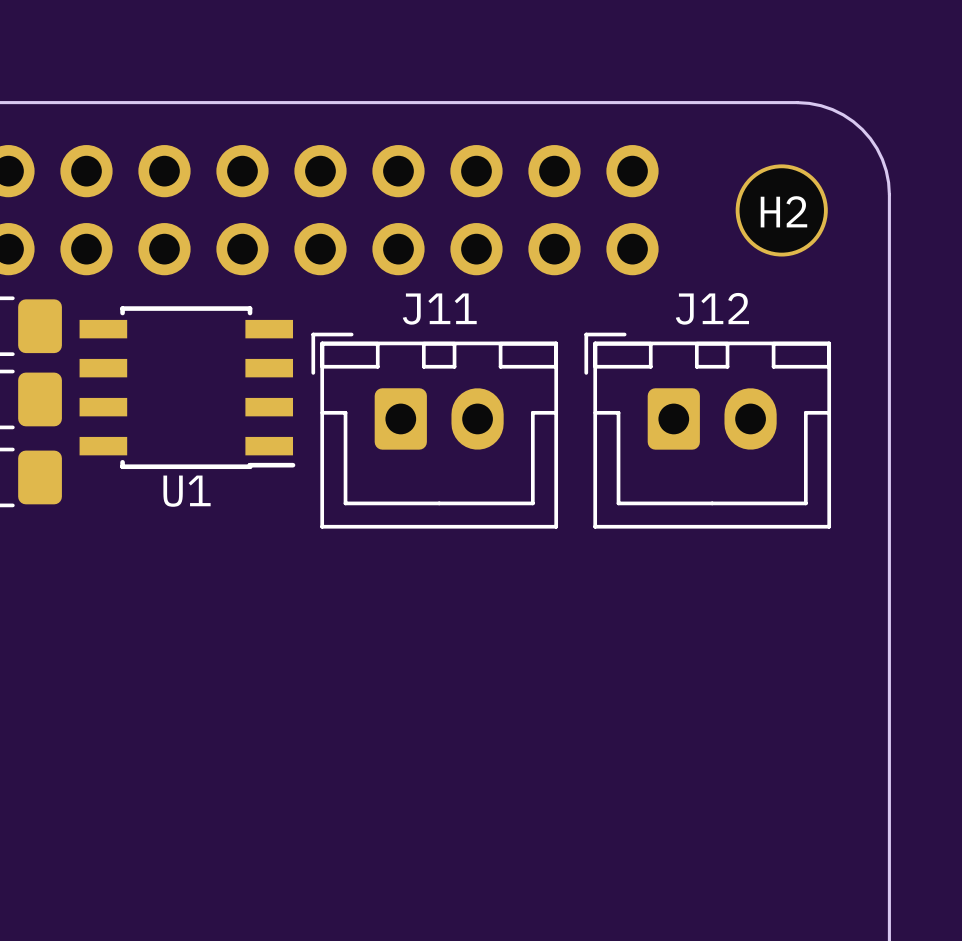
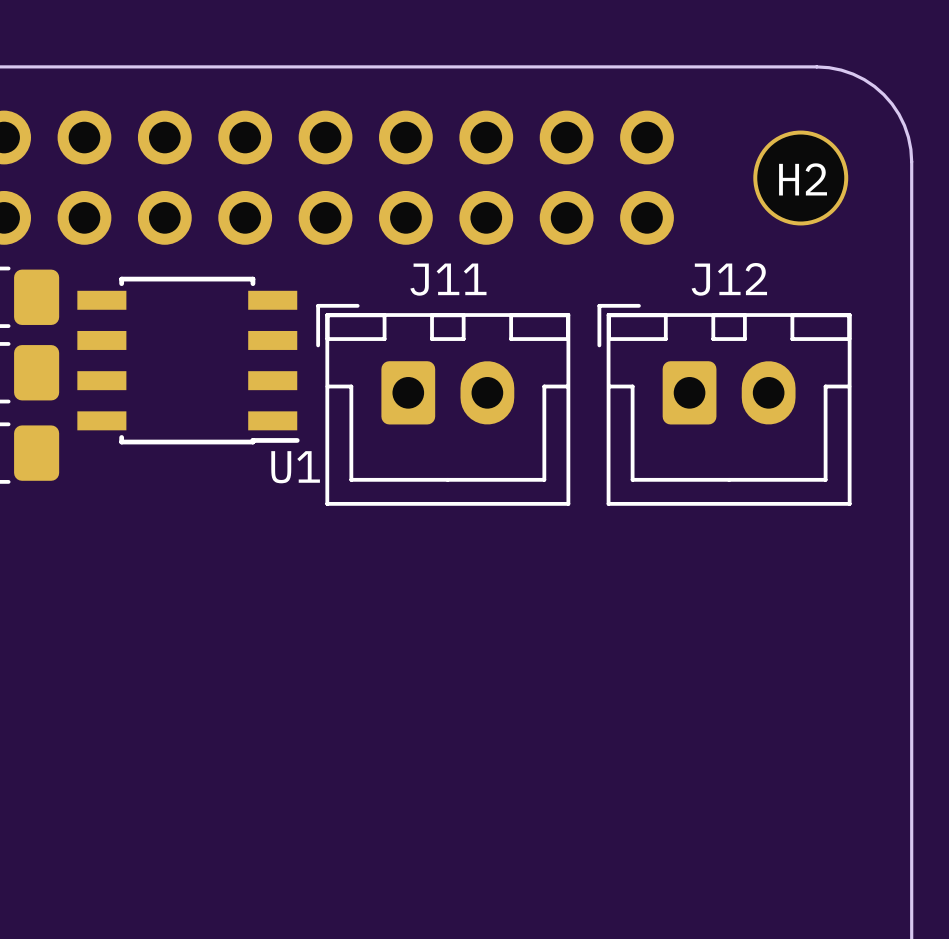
U1 name position: U1 (187, 491) -> U1 (295, 467)

